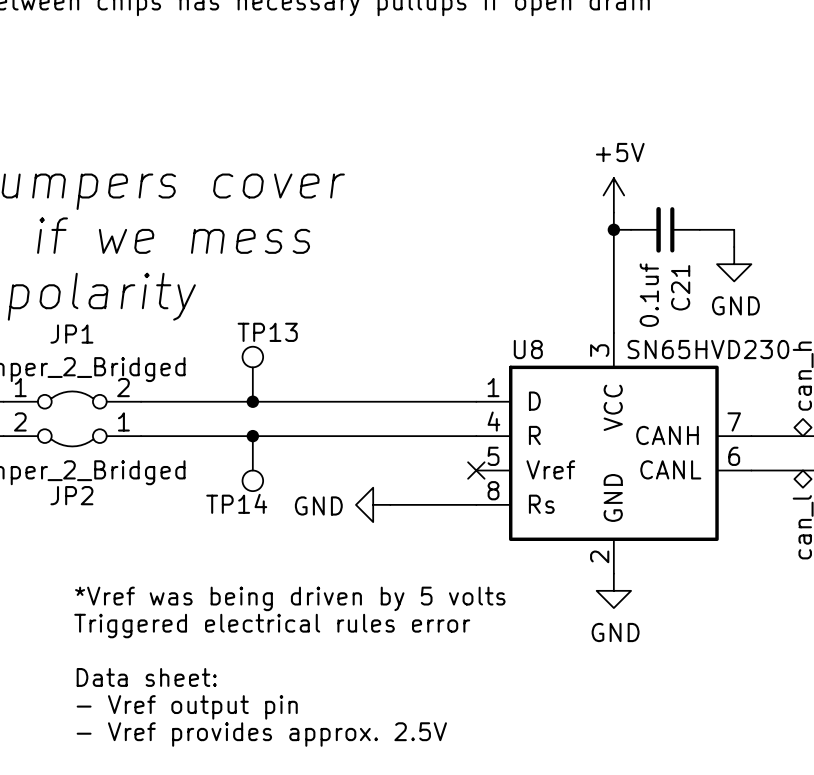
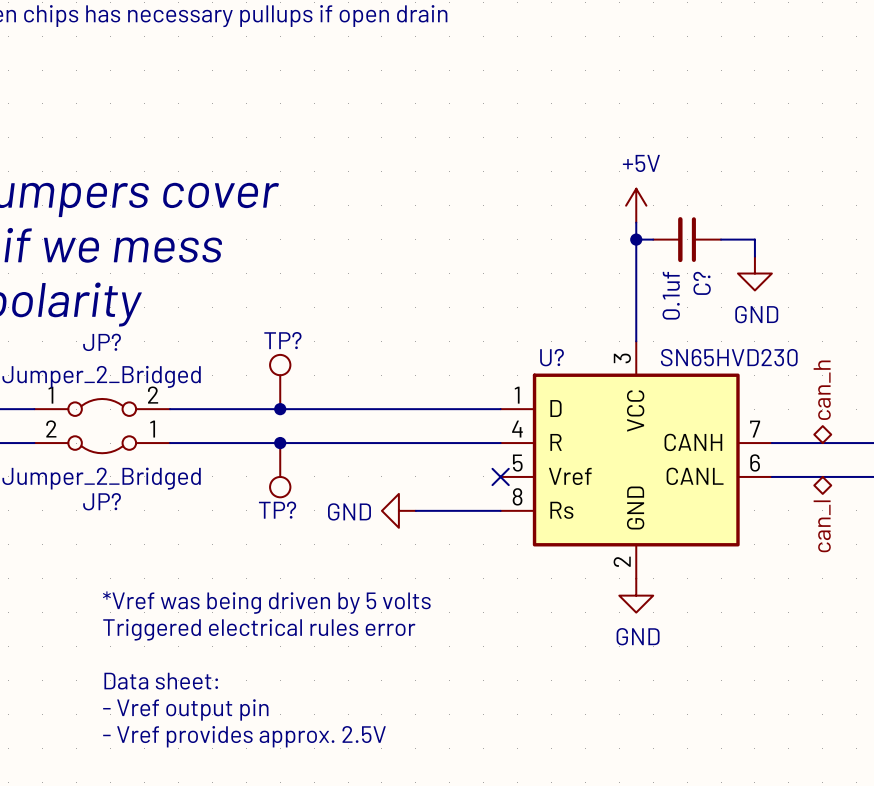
C21 name: C21 (680, 287) -> C? (702, 283)
TP13 name: TP13 (267, 332) -> TP? (282, 340)
JP1 name: JP1 (71, 334) -> JP? (102, 342)
U8 name: U8 (528, 349) -> U? (552, 357)
JP2 name: JP2 (71, 495) -> JP? (102, 501)
TP14 name: TP14 (236, 503) -> TP? (277, 510)

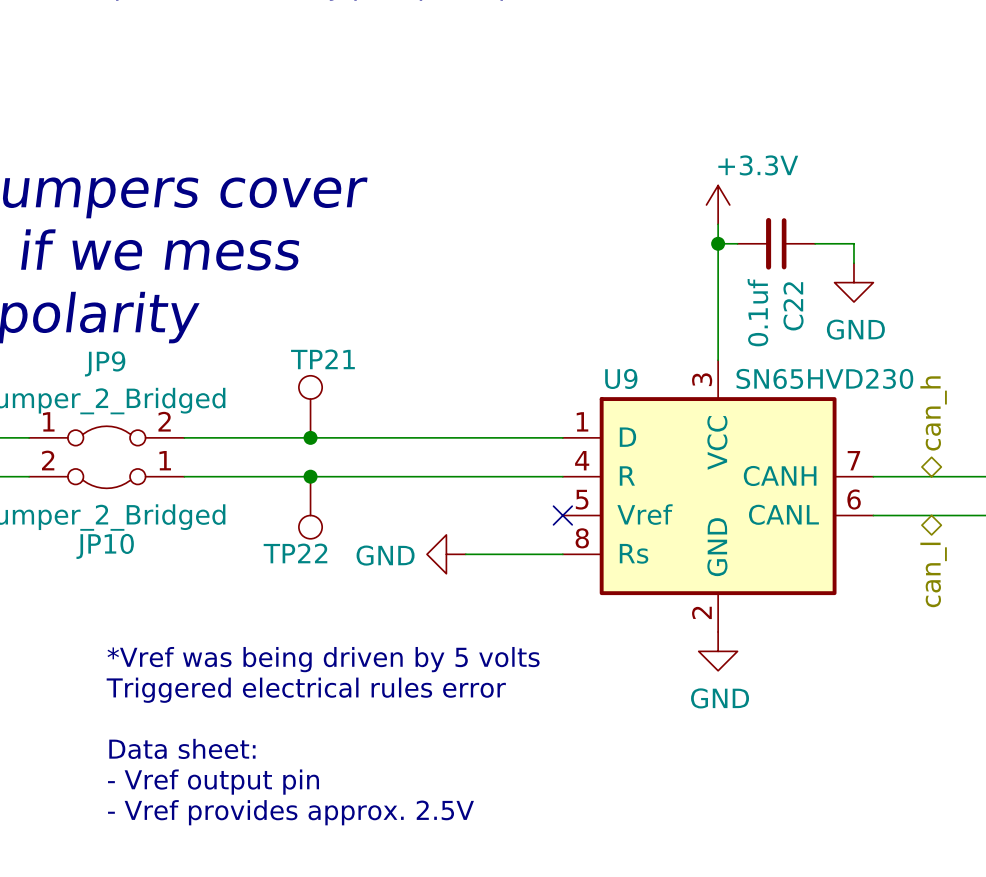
power symbol: +5V (636, 205) -> +3.3V (718, 204)
C? name: C? (702, 283) -> C22 (793, 306)
TP? name: TP? (282, 340) -> TP21 (322, 359)
JP? name: JP? (102, 342) -> JP9 (105, 363)
U? name: U? (552, 357) -> U9 (621, 378)
JP? name: JP? (102, 501) -> JP10 (105, 546)
TP? name: TP? (277, 510) -> TP22 (295, 553)

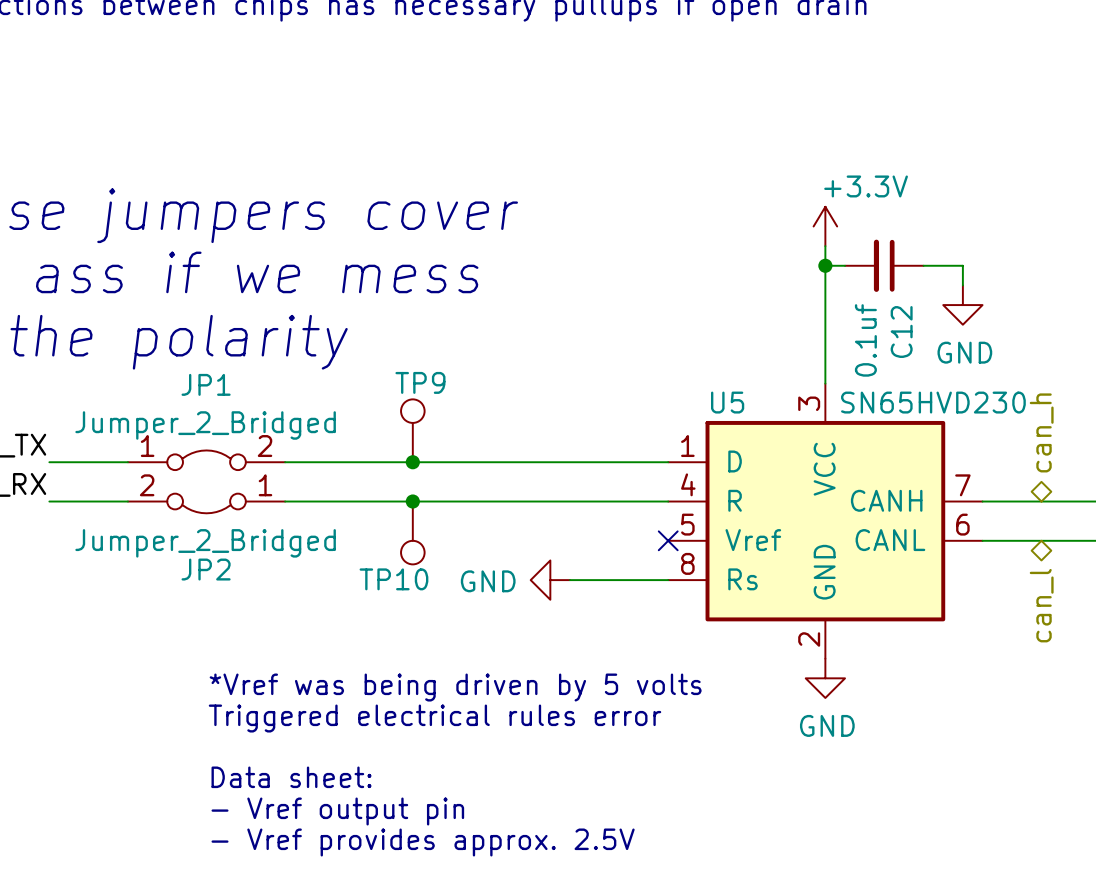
C22 name: C22 (793, 306) -> C12 (901, 332)
TP21 name: TP21 (322, 359) -> TP9 (420, 382)
JP9 name: JP9 (105, 363) -> JP1 (206, 384)
U9 name: U9 (621, 378) -> U5 (727, 402)
JP10 name: JP10 (105, 546) -> JP2 (206, 569)
TP22 name: TP22 (295, 553) -> TP10 (393, 579)

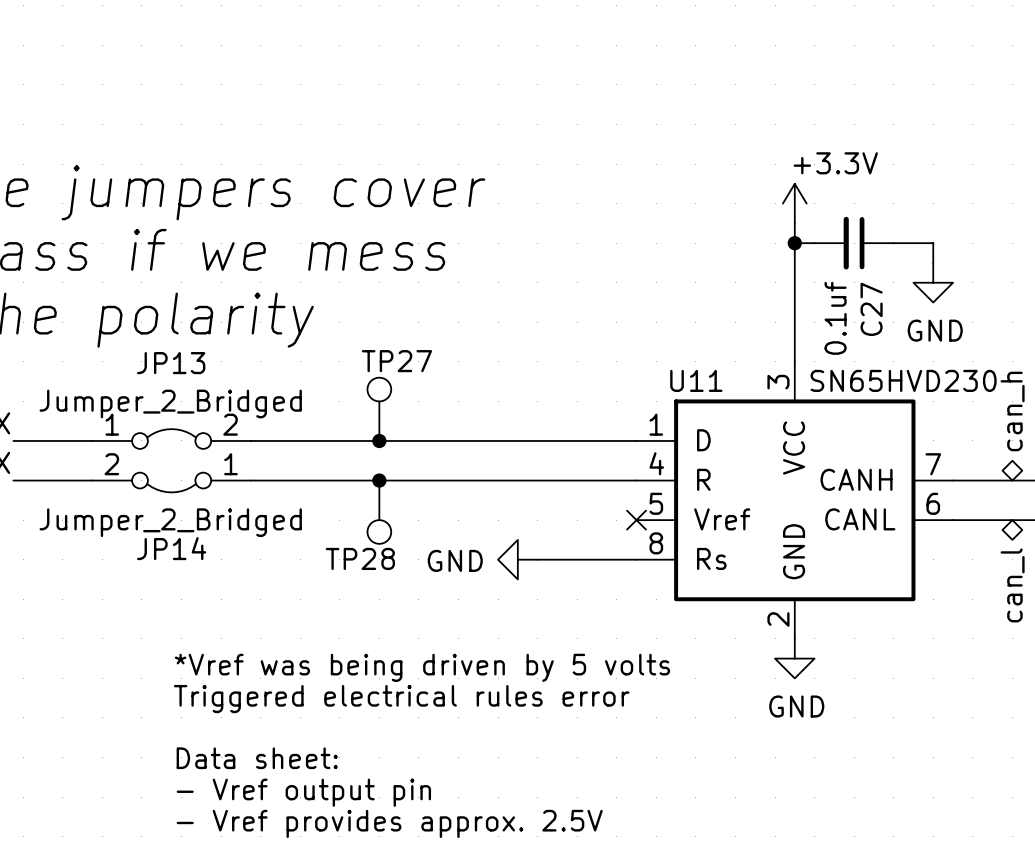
C12 name: C12 (901, 332) -> C27 (871, 309)
TP9 name: TP9 (420, 382) -> TP27 (396, 361)
JP1 name: JP1 (206, 384) -> JP13 (171, 363)
U5 name: U5 (727, 402) -> U11 (696, 380)
JP2 name: JP2 (206, 569) -> JP14 (171, 548)
TP10 name: TP10 (393, 579) -> TP28 (360, 558)

